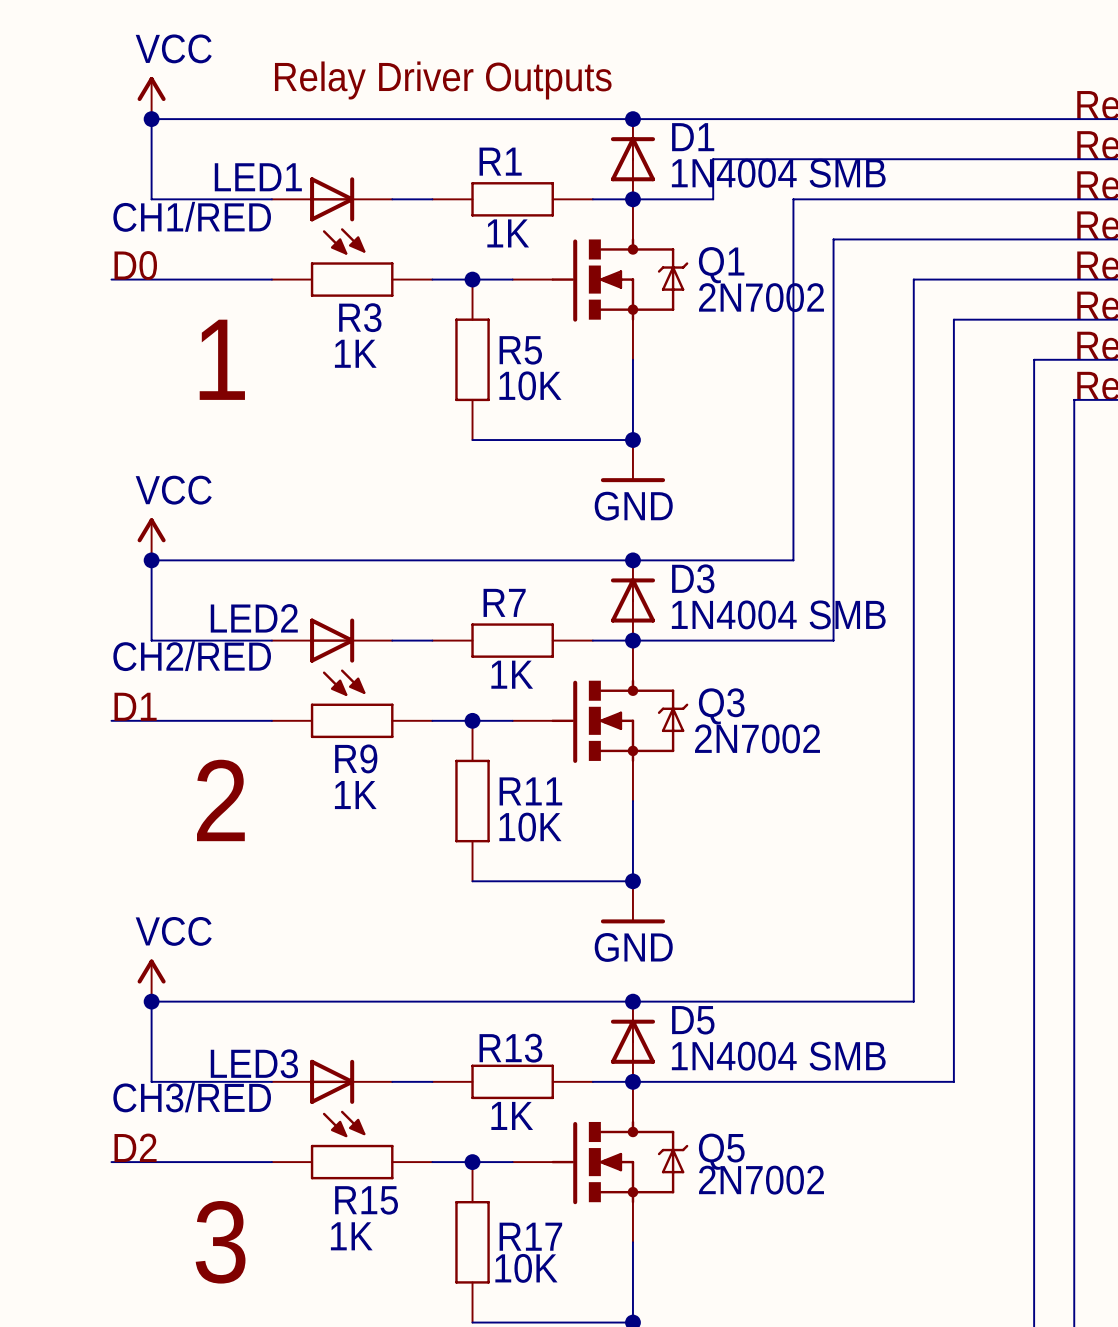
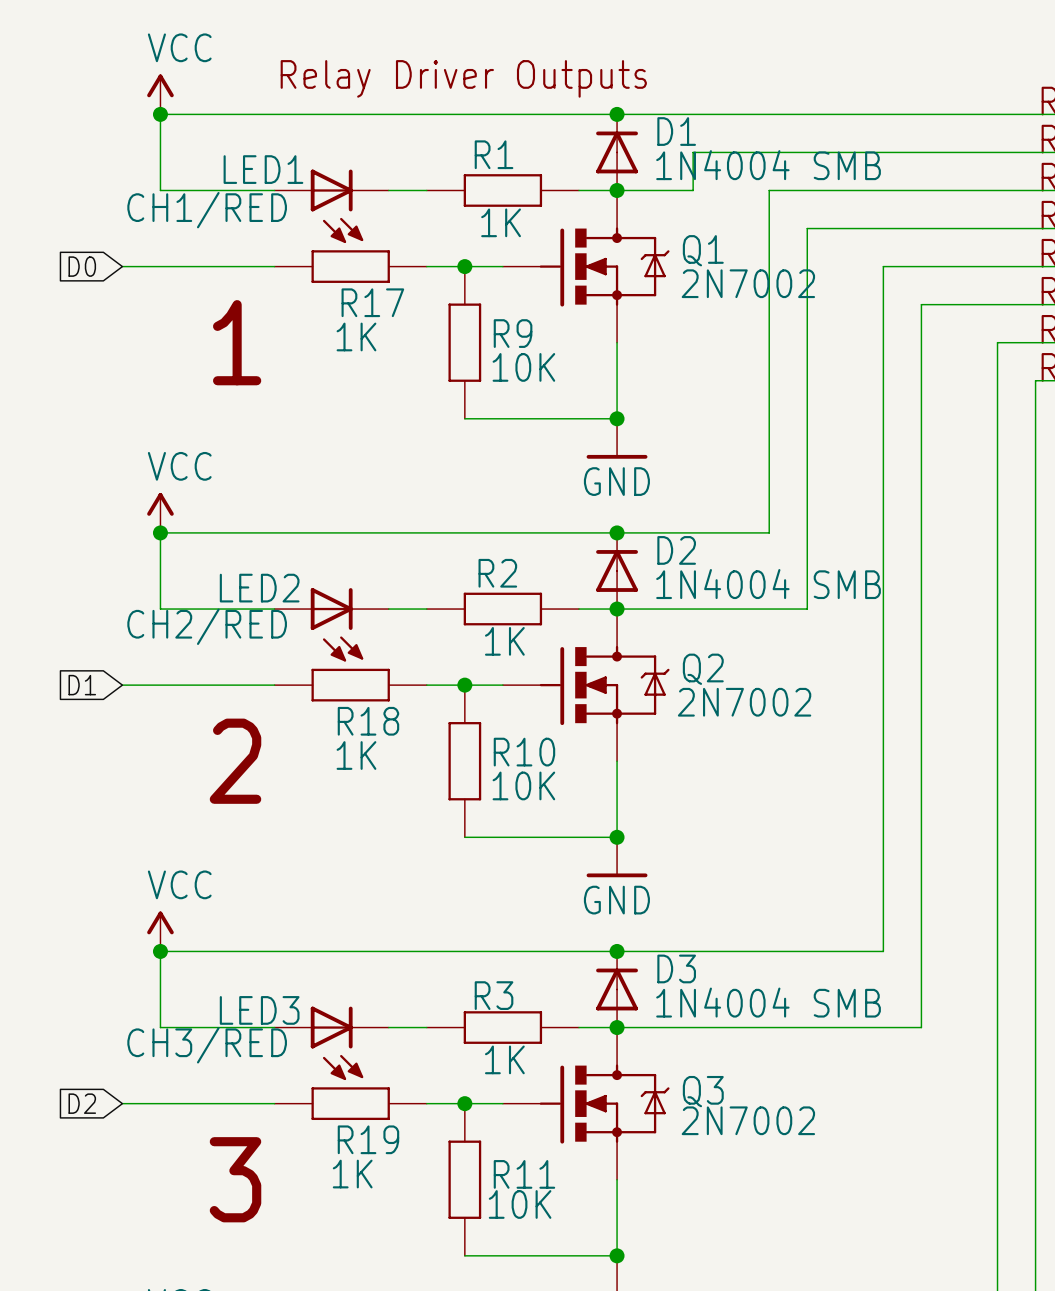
label: D0 (135, 265) -> none
global label: none -> D0 (82, 266)
R3 name: R3 (360, 317) -> R17 (372, 302)
R5 name: R5 (520, 350) -> R9 (513, 333)
D3 name: D3 (693, 578) -> D2 (676, 550)
R7 name: R7 (504, 602) -> R2 (497, 573)
label: D1 (135, 706) -> none
Q3 name: Q3 (721, 706) -> Q2 (703, 669)
global label: none -> D1 (82, 685)
R9 name: R9 (356, 758) -> R18 (368, 721)
R11 name: R11 (530, 791) -> R10 (524, 752)
D5 name: D5 (693, 1020) -> D3 (676, 968)
R13 name: R13 (510, 1048) -> R3 (494, 995)
label: D2 (135, 1147) -> none
Q5 name: Q5 (721, 1151) -> Q3 (703, 1091)
global label: none -> D2 (82, 1103)
R15 name: R15 (366, 1200) -> R19 (368, 1139)
R17 name: R17 (530, 1236) -> R11 (524, 1174)

